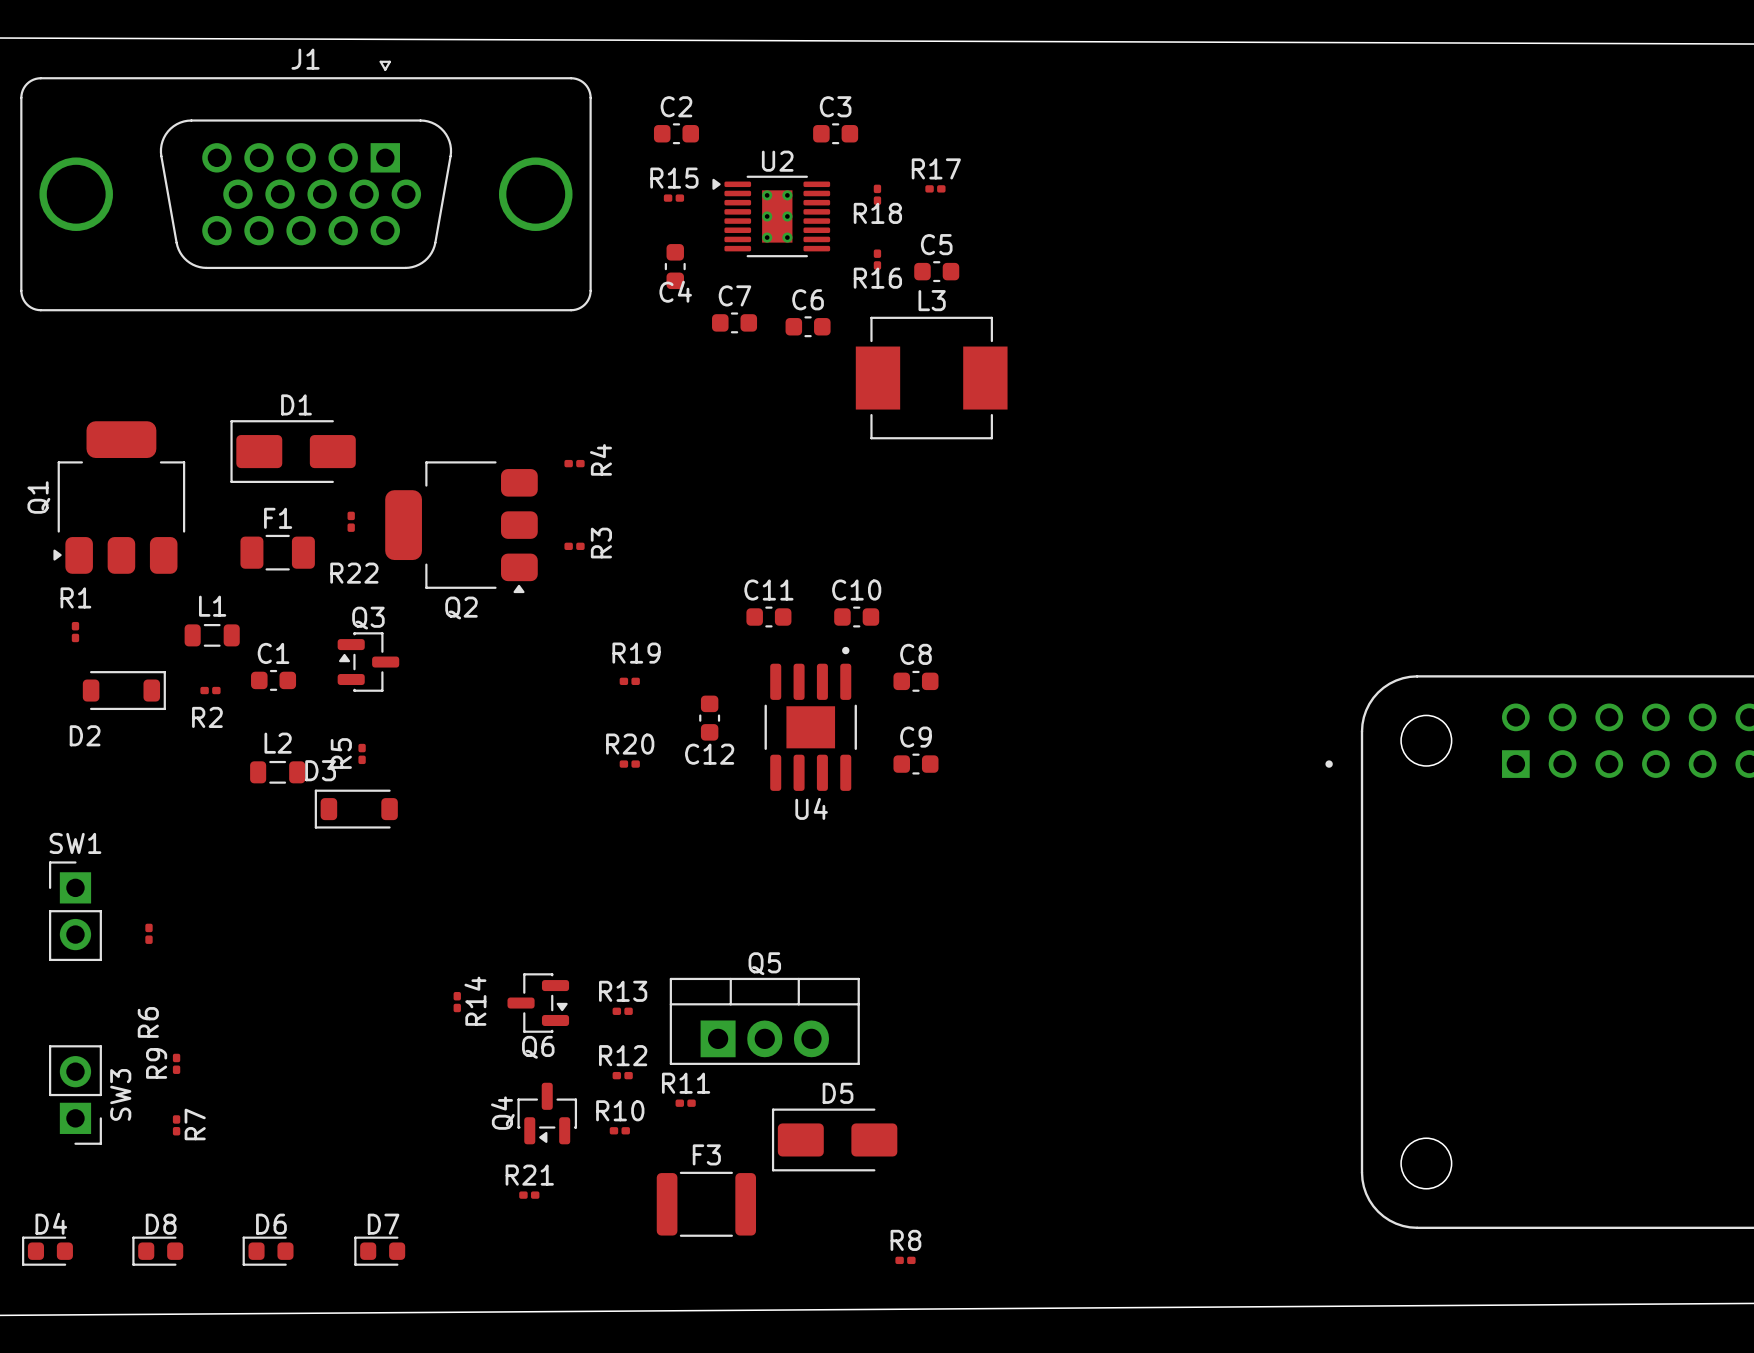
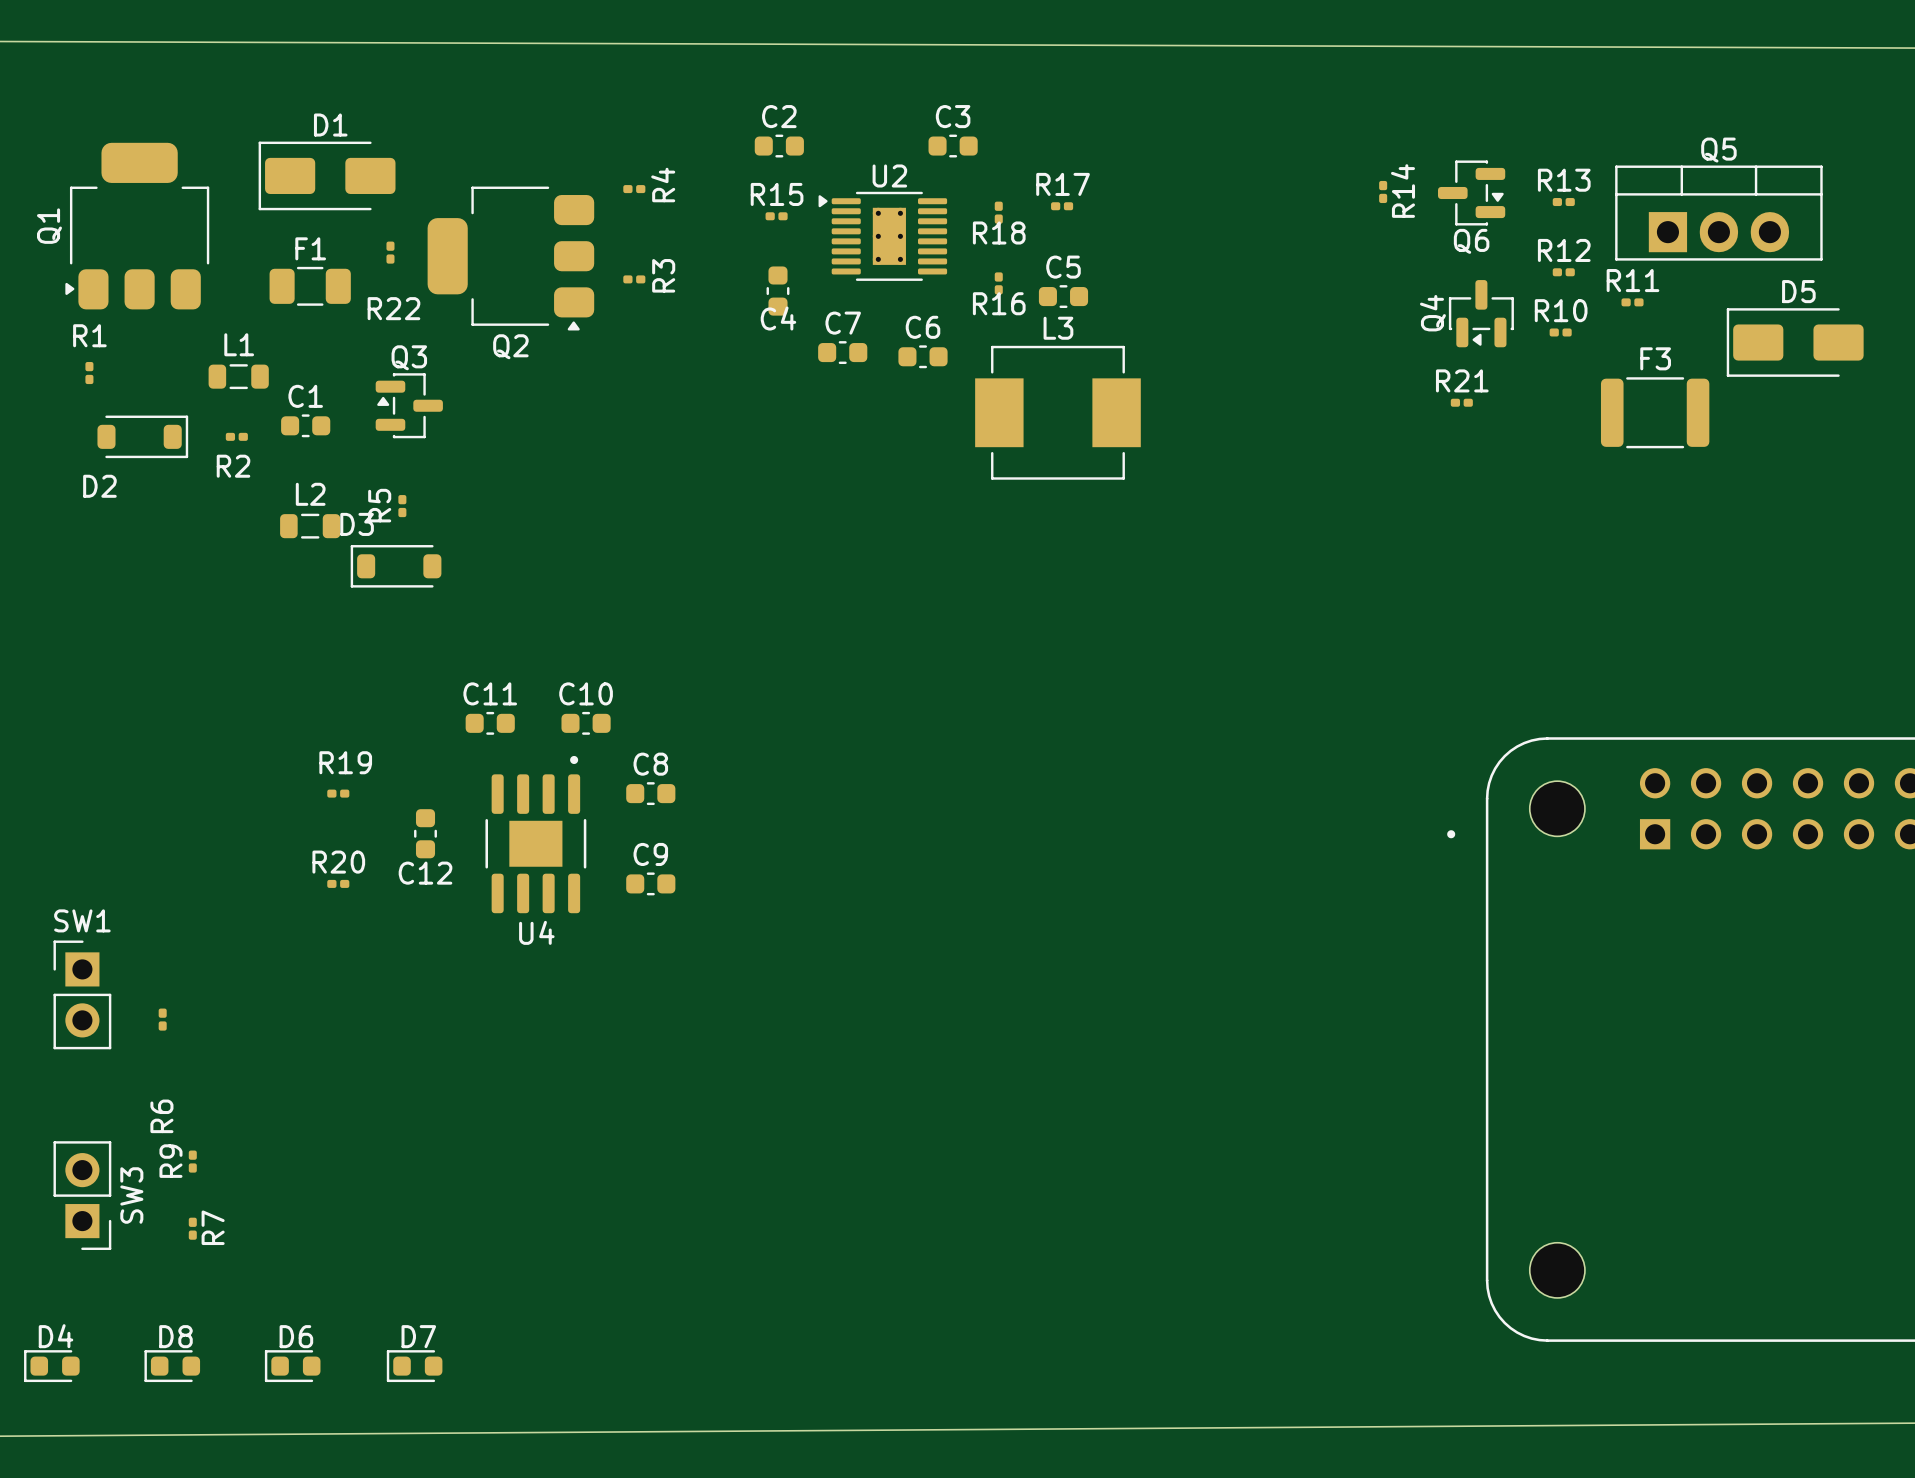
C2 position: (676, 133) -> (779, 146)
C3 position: (835, 133) -> (953, 146)
J1: (305, 186) -> none
R17 position: (935, 188) -> (1062, 206)
R18 position: (877, 194) -> (998, 212)
R15 position: (673, 198) -> (776, 216)
U2 position: (771, 216) -> (882, 236)
R16 position: (877, 259) -> (998, 283)
C4 position: (675, 266) -> (777, 291)
C5 position: (936, 271) -> (1063, 296)
C7 position: (734, 322) -> (842, 352)
C6 position: (808, 326) -> (923, 356)
L3 position: (931, 378) -> (1057, 412)
D1 position: (293, 451) -> (327, 175)
R4 position: (574, 463) -> (634, 189)
Q1 position: (119, 497) -> (137, 226)
R22 position: (351, 521) -> (390, 252)
Q2 position: (461, 527) -> (510, 258)
R3 position: (574, 546) -> (634, 279)
F1 position: (277, 552) -> (310, 286)
C11 position: (768, 617) -> (490, 723)
C10 position: (856, 617) -> (586, 723)
R1 position: (75, 632) -> (89, 373)
L1 position: (212, 635) -> (238, 376)
Q3 position: (368, 662) -> (409, 405)
C1 position: (273, 680) -> (305, 425)
R19 position: (629, 681) -> (338, 793)
C8 position: (915, 681) -> (650, 793)
D2 position: (124, 690) -> (142, 436)
R2 position: (210, 690) -> (236, 436)
C12 position: (709, 718) -> (425, 833)
U4 position: (810, 718) -> (535, 834)
R5 position: (362, 753) -> (402, 506)
R20 position: (629, 764) -> (338, 883)
C9 position: (915, 764) -> (650, 883)
L2 position: (277, 772) -> (310, 526)
D3 position: (356, 809) -> (396, 566)
R14 position: (457, 1002) -> (1383, 191)
Q6 position: (538, 1003) -> (1471, 192)
R13 position: (622, 1011) -> (1563, 202)
Q5 position: (764, 1021) -> (1718, 213)
R12 position: (622, 1075) -> (1563, 272)
R11 position: (685, 1103) -> (1632, 302)
Q4 position: (547, 1113) -> (1481, 313)
R10 position: (619, 1130) -> (1560, 332)
D5 position: (834, 1139) -> (1795, 342)
R21 position: (529, 1195) -> (1461, 402)
F3 position: (706, 1204) -> (1655, 412)
R8: (905, 1260) -> none

